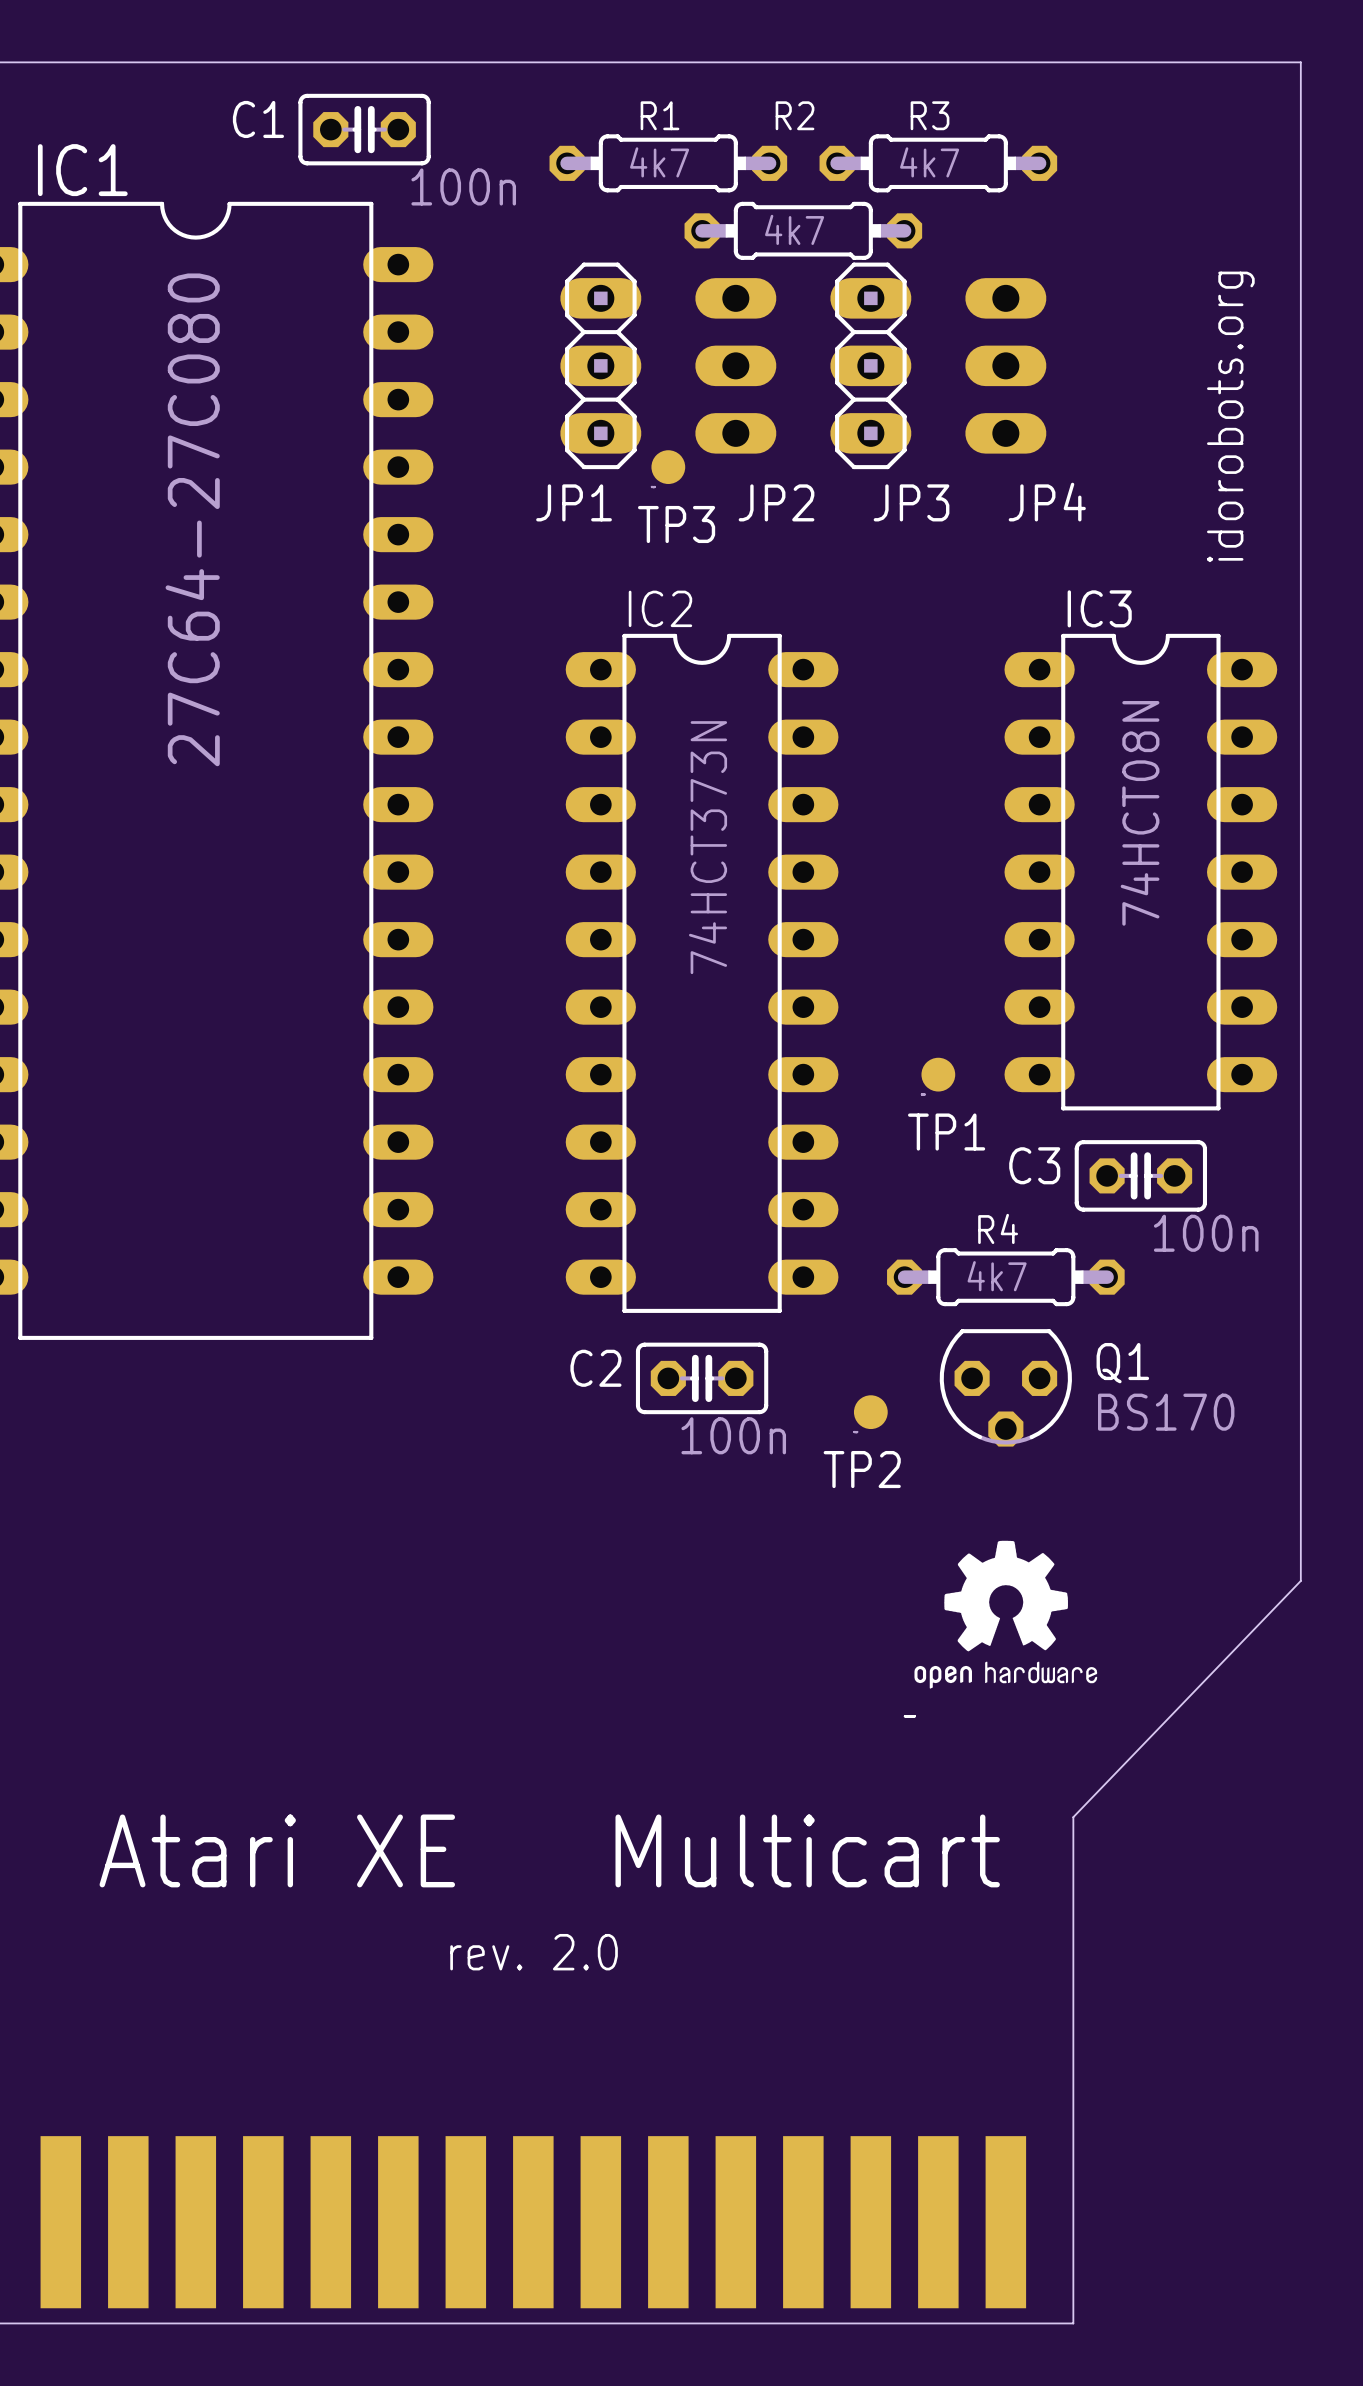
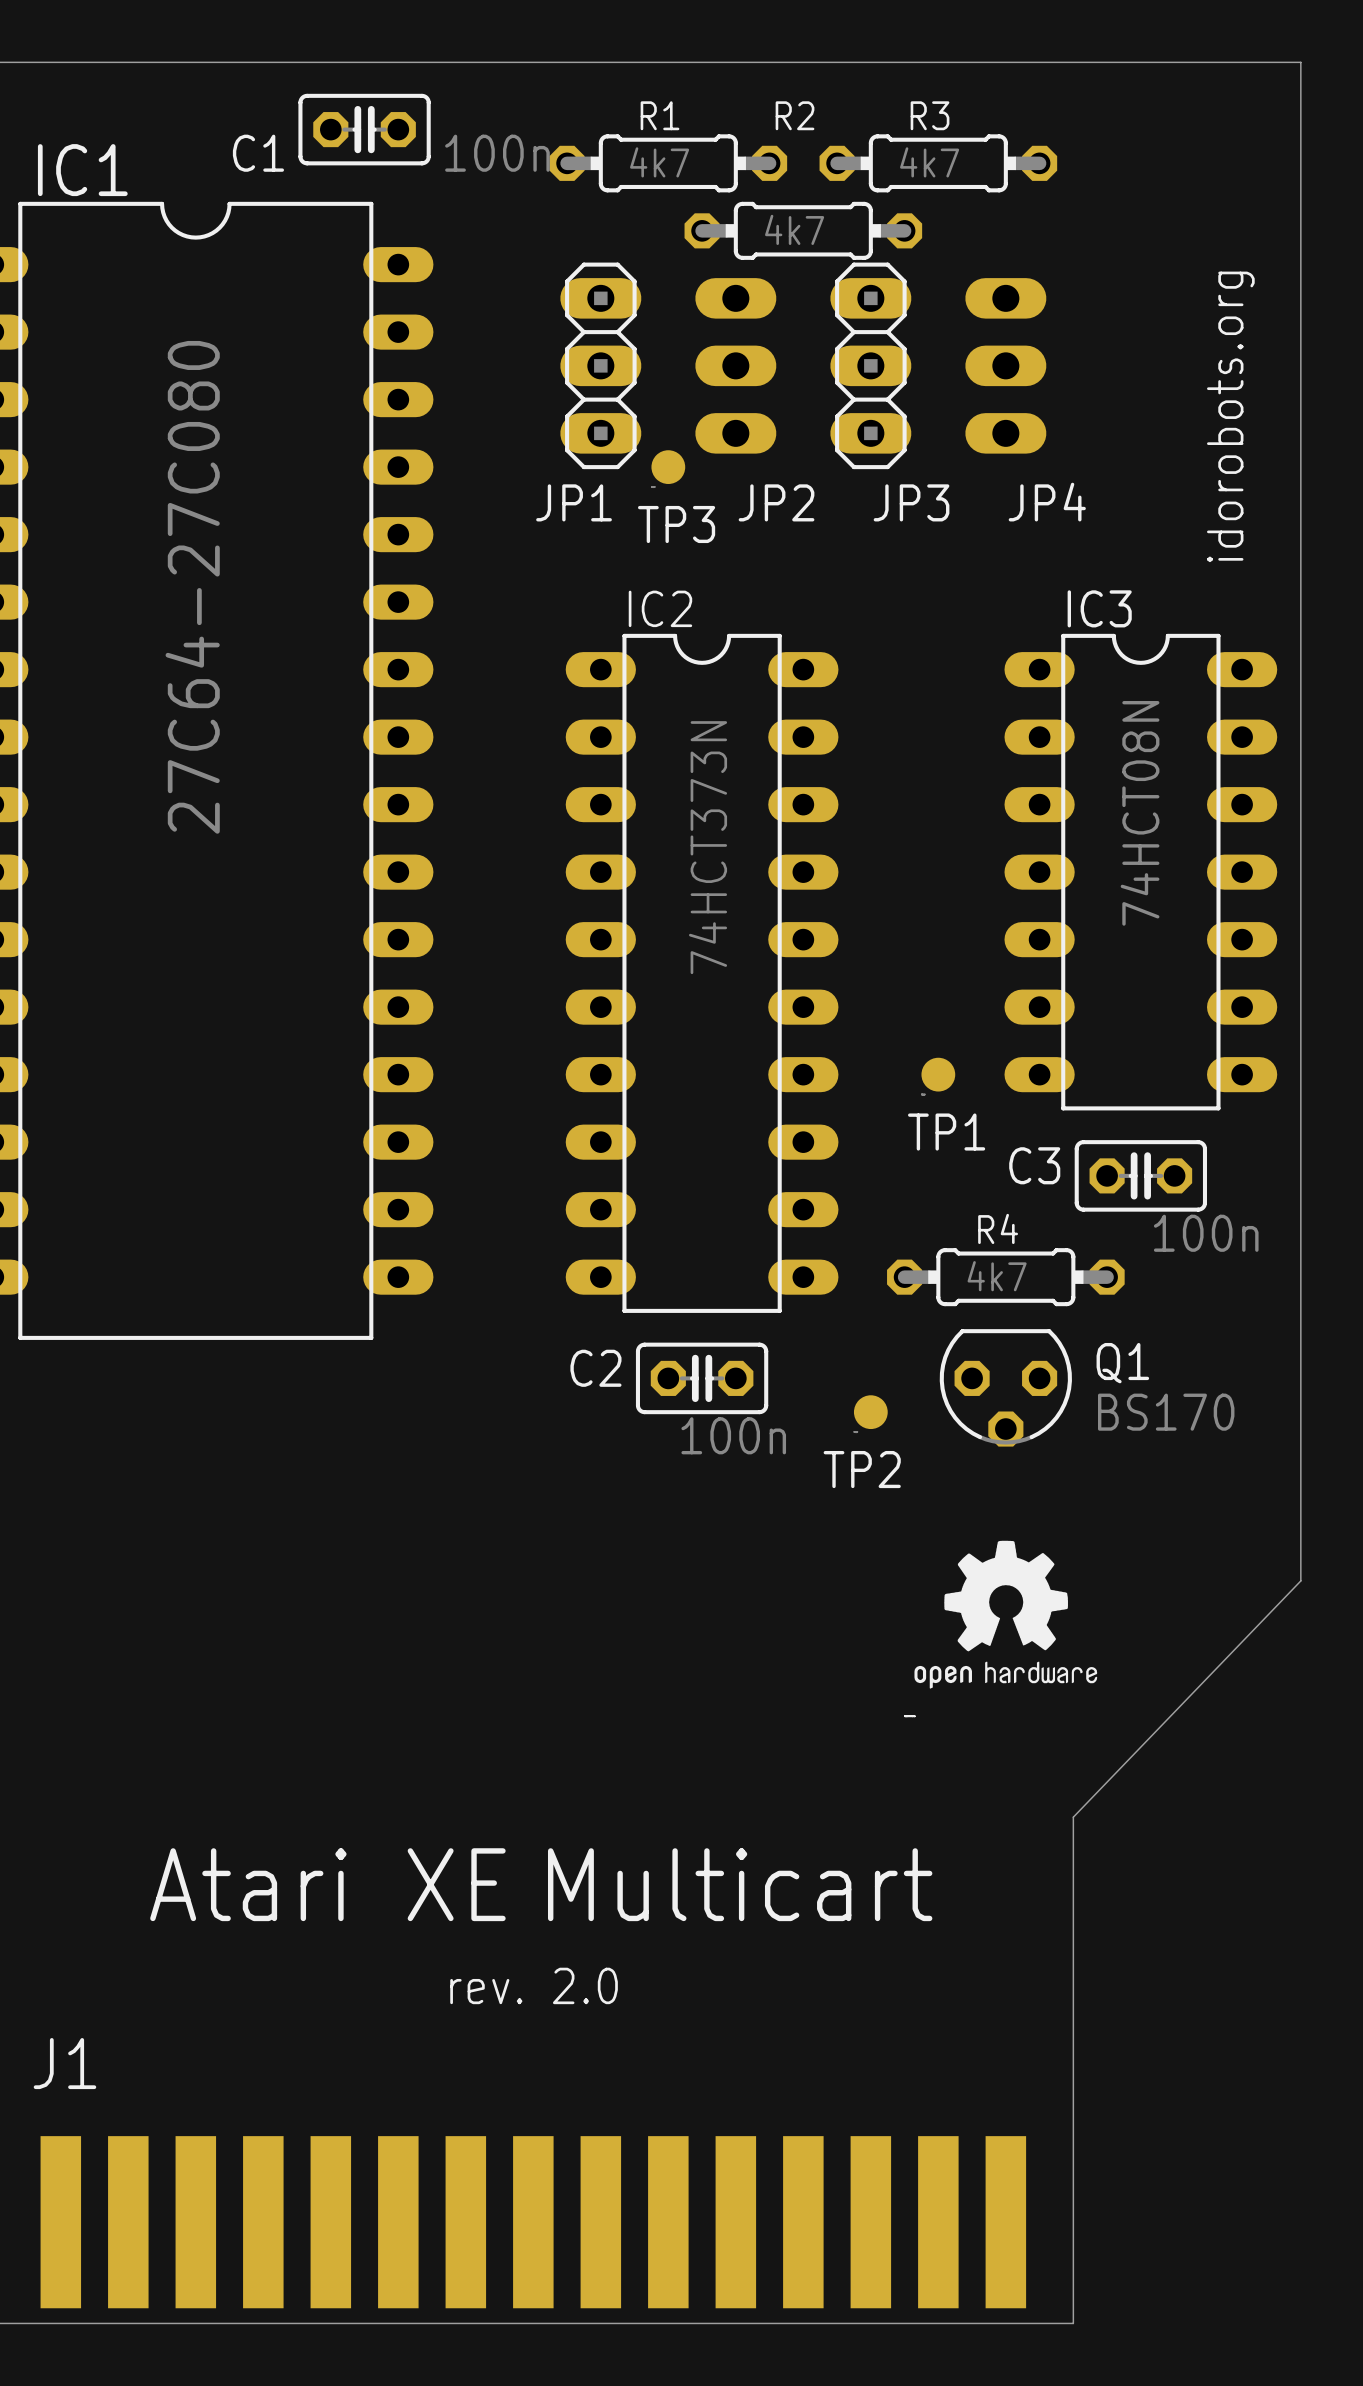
C1 name position: C1 (258, 119) -> C1 (258, 153)
C1 value position: 100n (463, 186) -> 100n (497, 153)
IC1 value position: 27C64-27C080 (192, 519) -> 27C64-27C080 (192, 587)
text position: Atari XE (277, 1850) -> Atari XE (327, 1884)
text position: Multicart (807, 1850) -> Multicart (740, 1884)
text position: rev. 2.0 (534, 1952) -> rev. 2.0 (534, 1985)
J1 name: none -> J1 (64, 2063)

